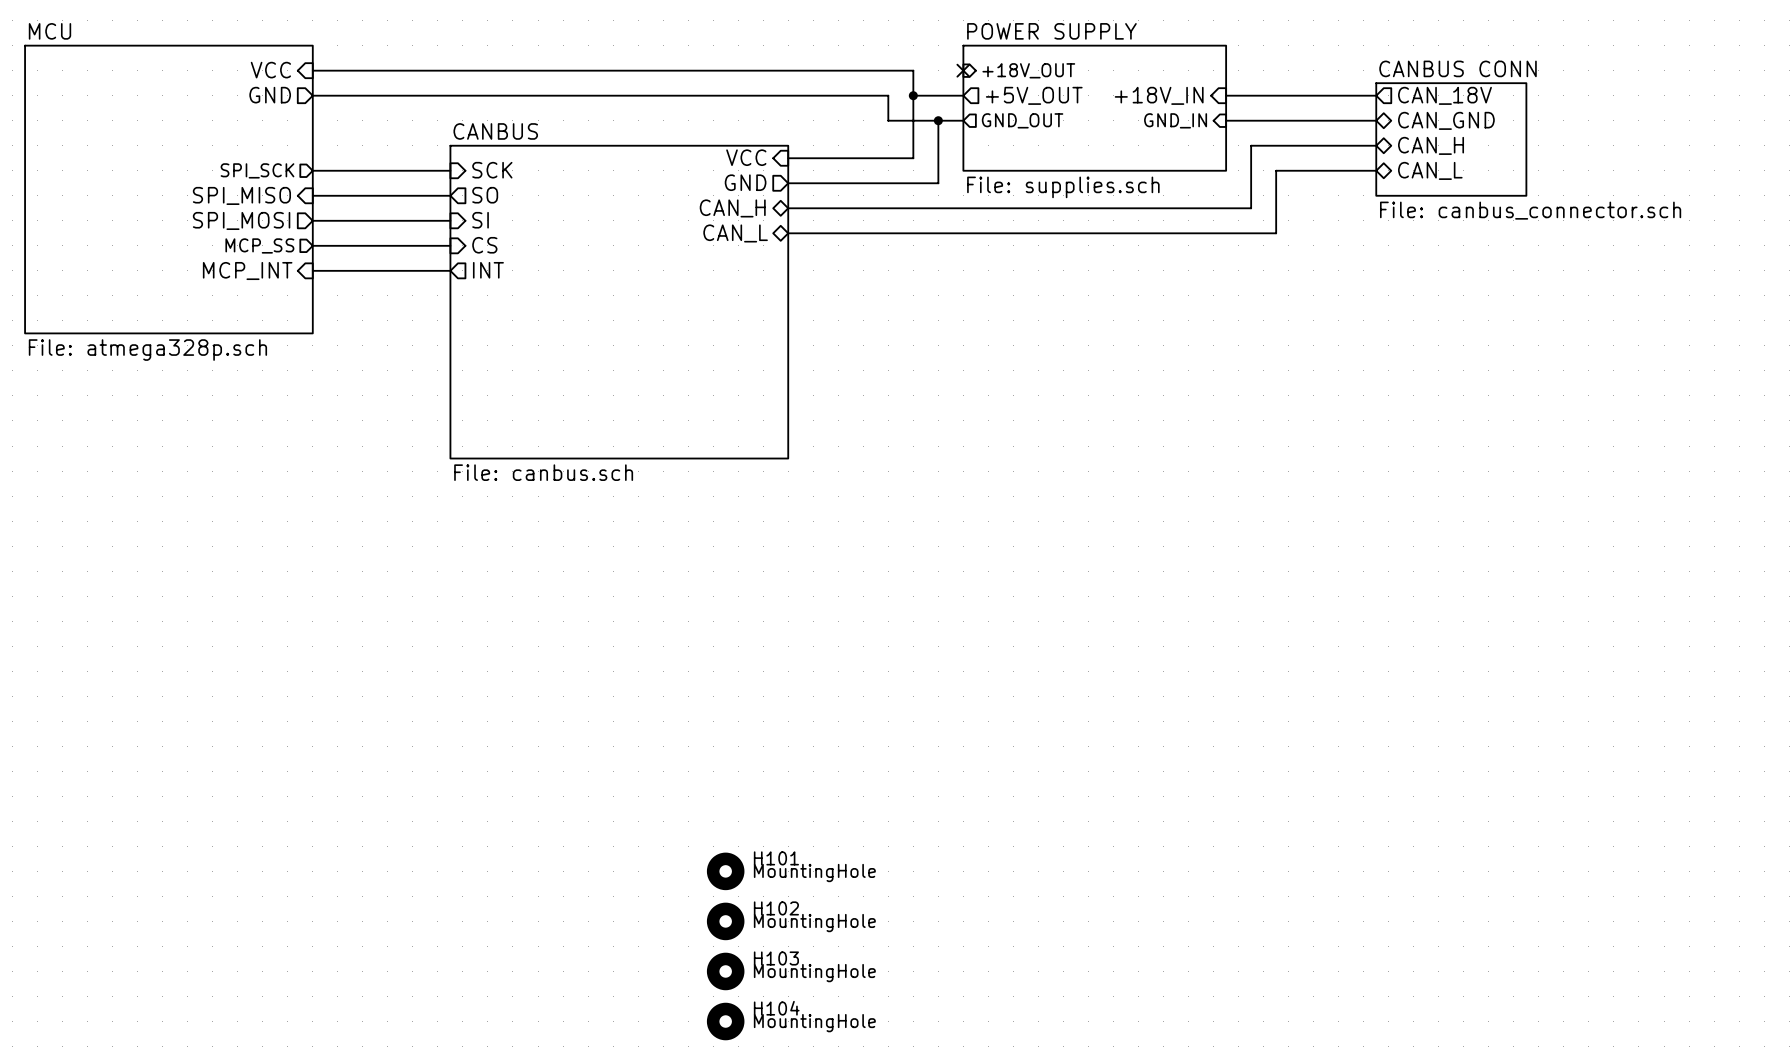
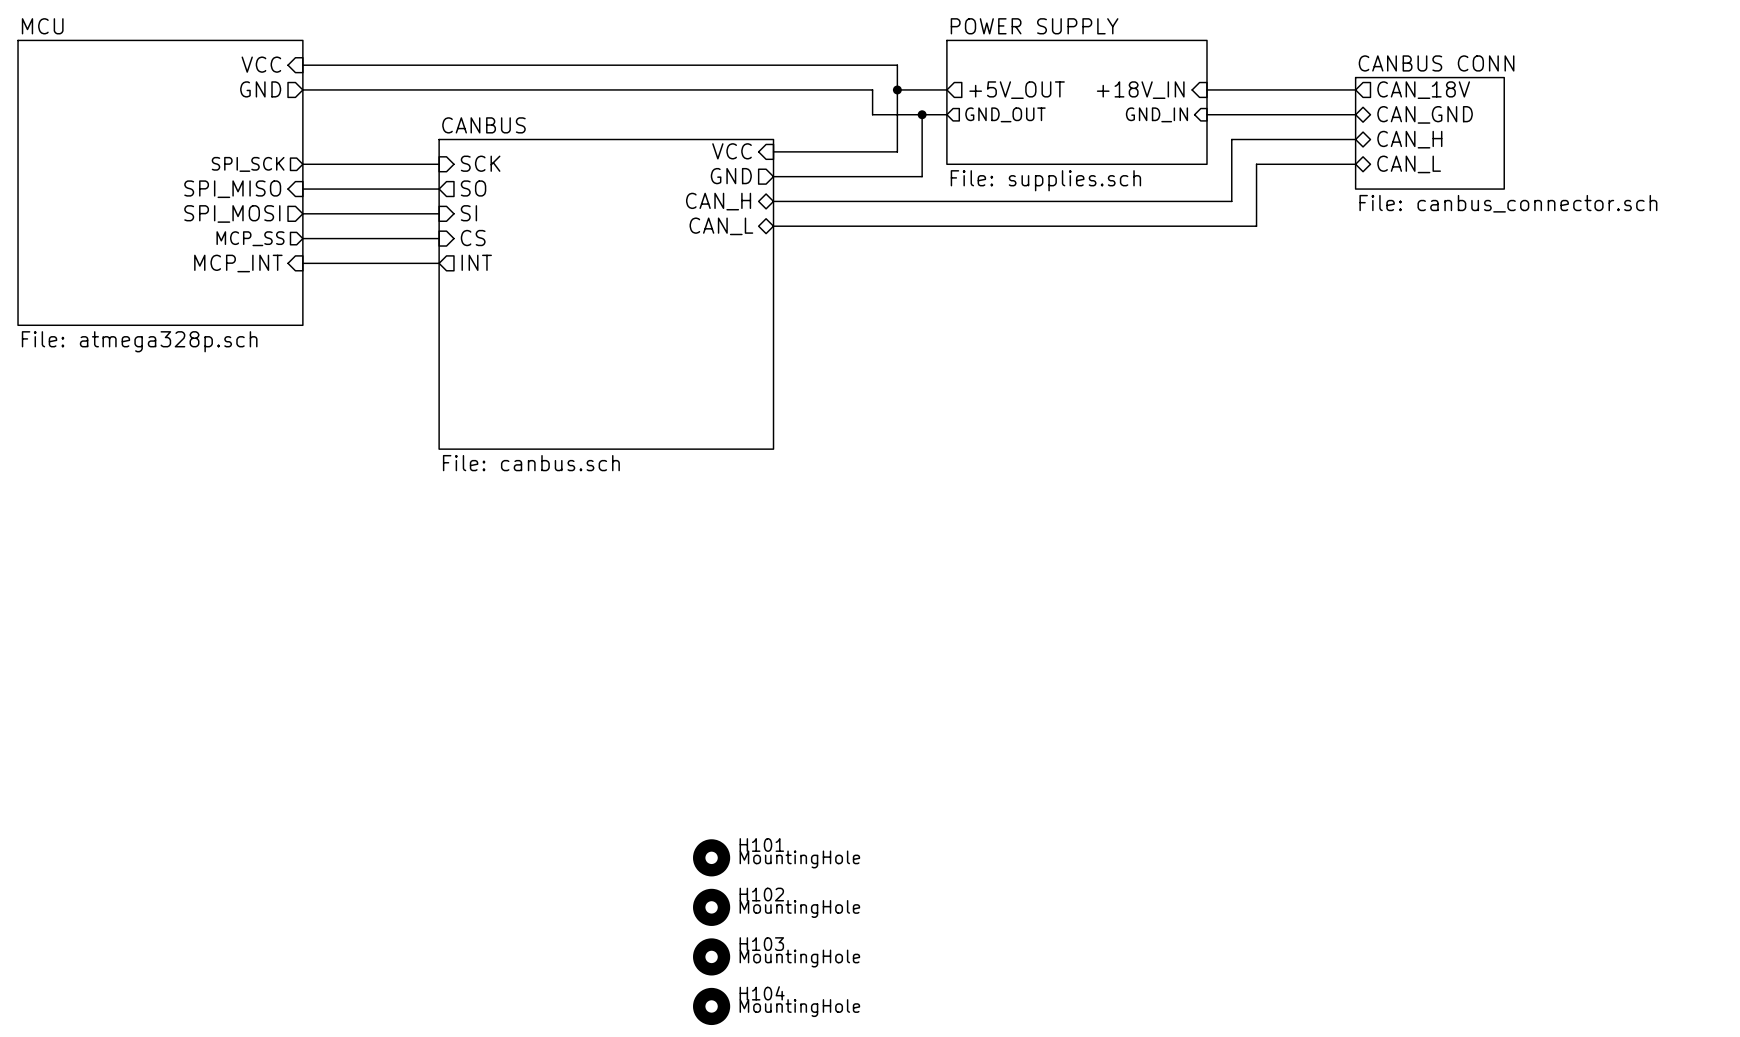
no-connect mark: (963, 70) -> none
sheet pin: +18V_OUT (1028, 70) -> none

